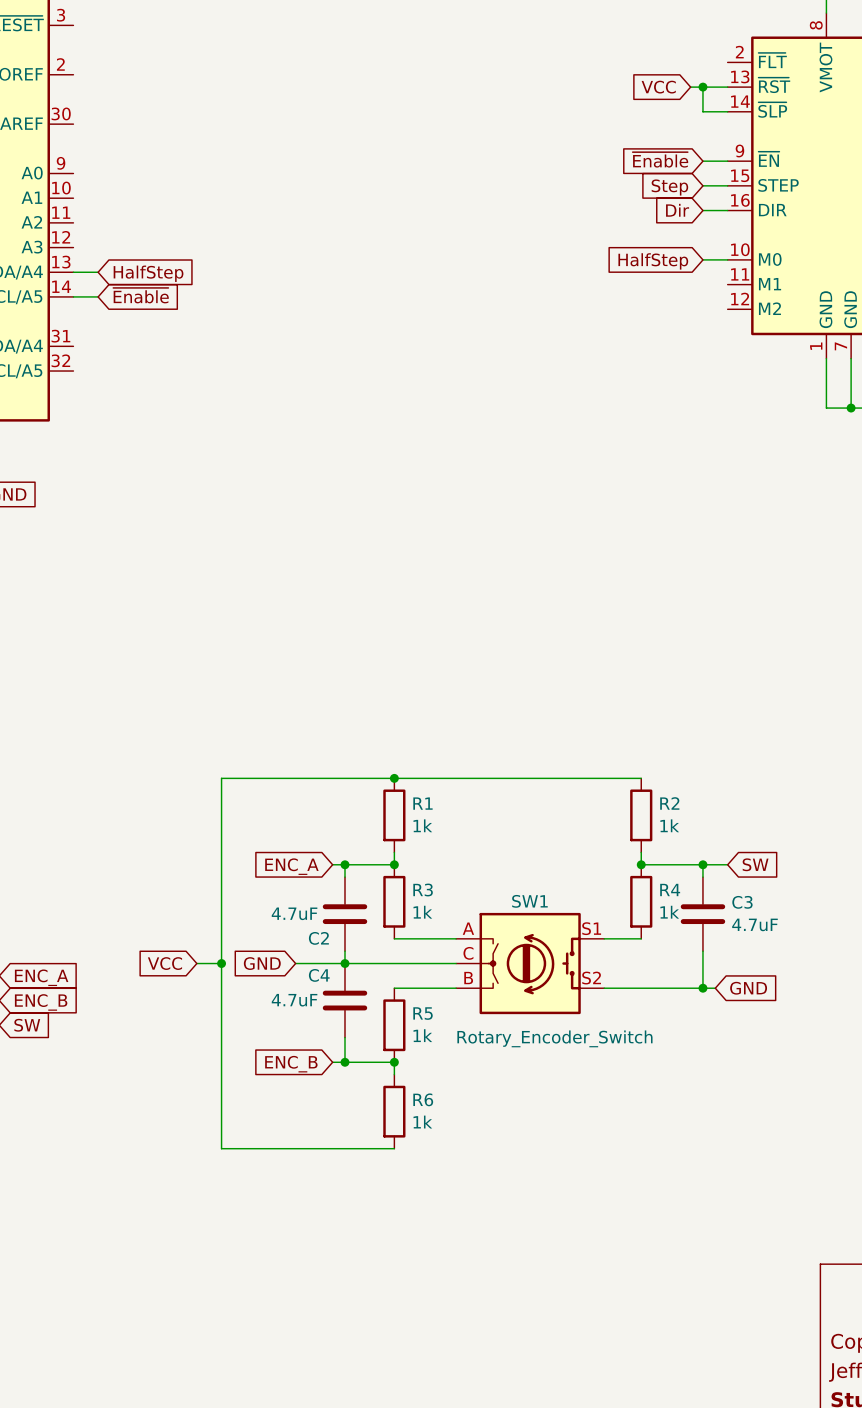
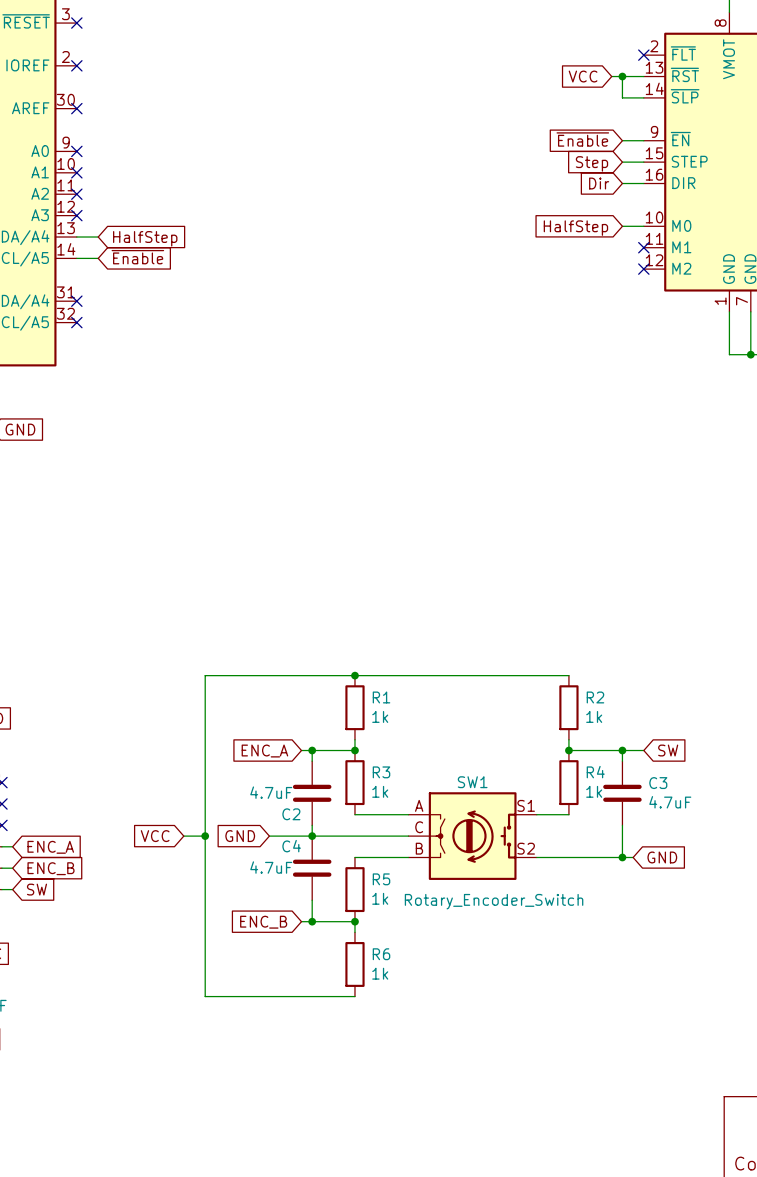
no-connect mark: none -> (76, 23)
no-connect mark: none -> (643, 55)
no-connect mark: none -> (76, 65)
no-connect mark: none -> (76, 108)
no-connect mark: none -> (76, 151)
no-connect mark: none -> (76, 172)
no-connect mark: none -> (76, 194)
no-connect mark: none -> (76, 215)
no-connect mark: none -> (643, 247)
no-connect mark: none -> (643, 269)
no-connect mark: none -> (76, 301)
no-connect mark: none -> (76, 322)

